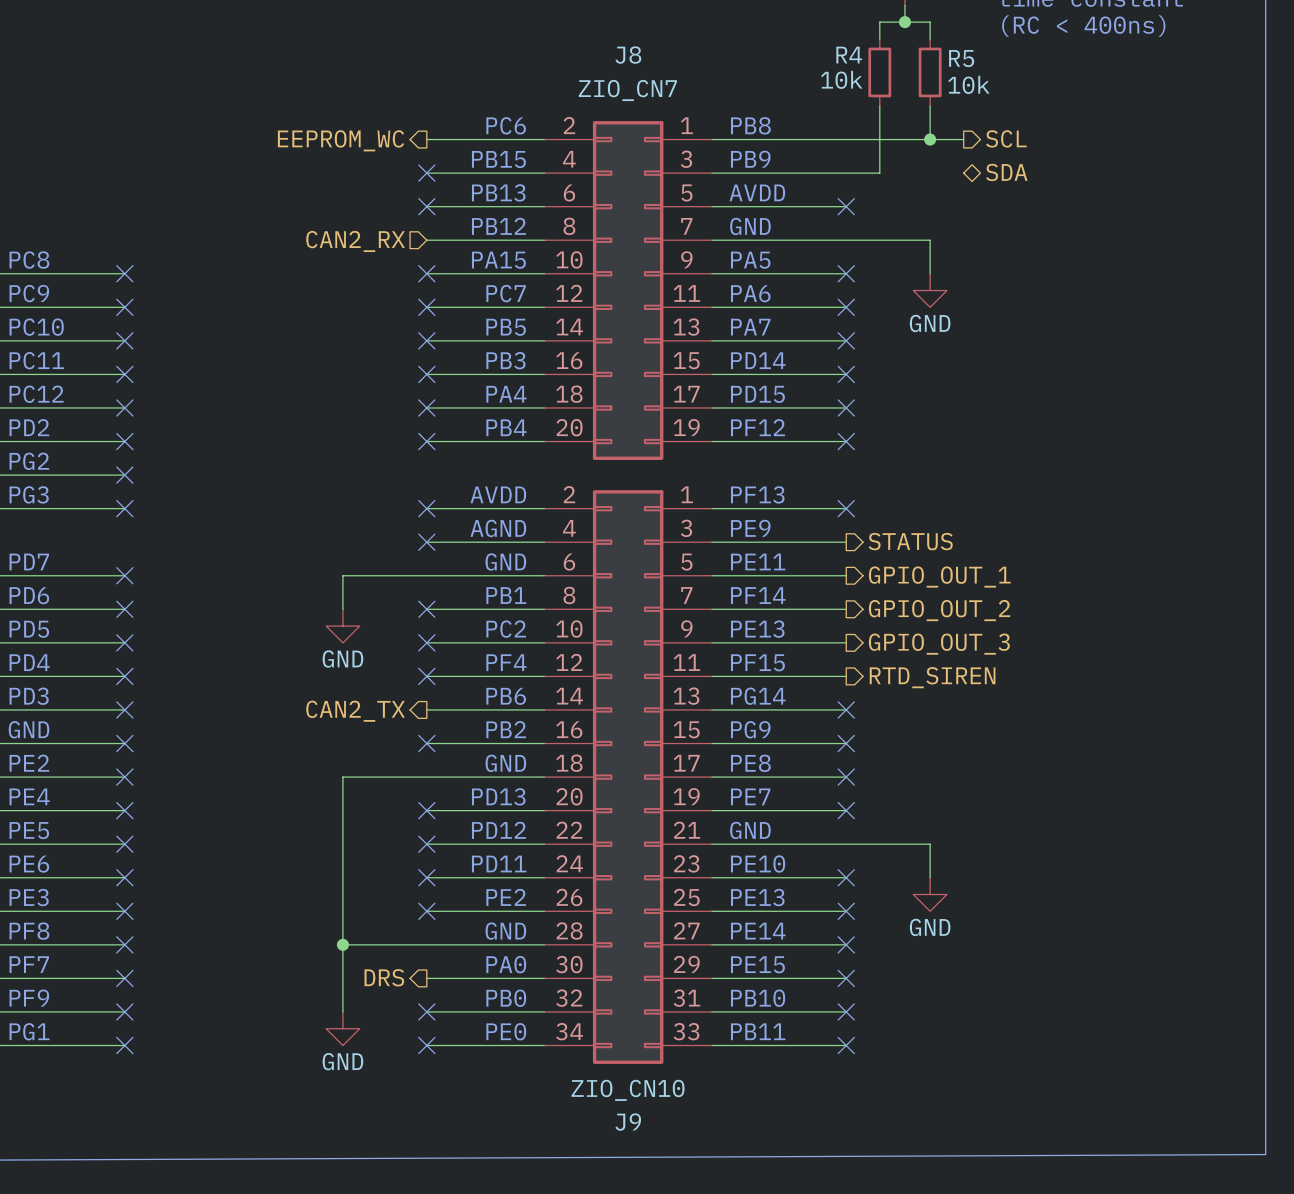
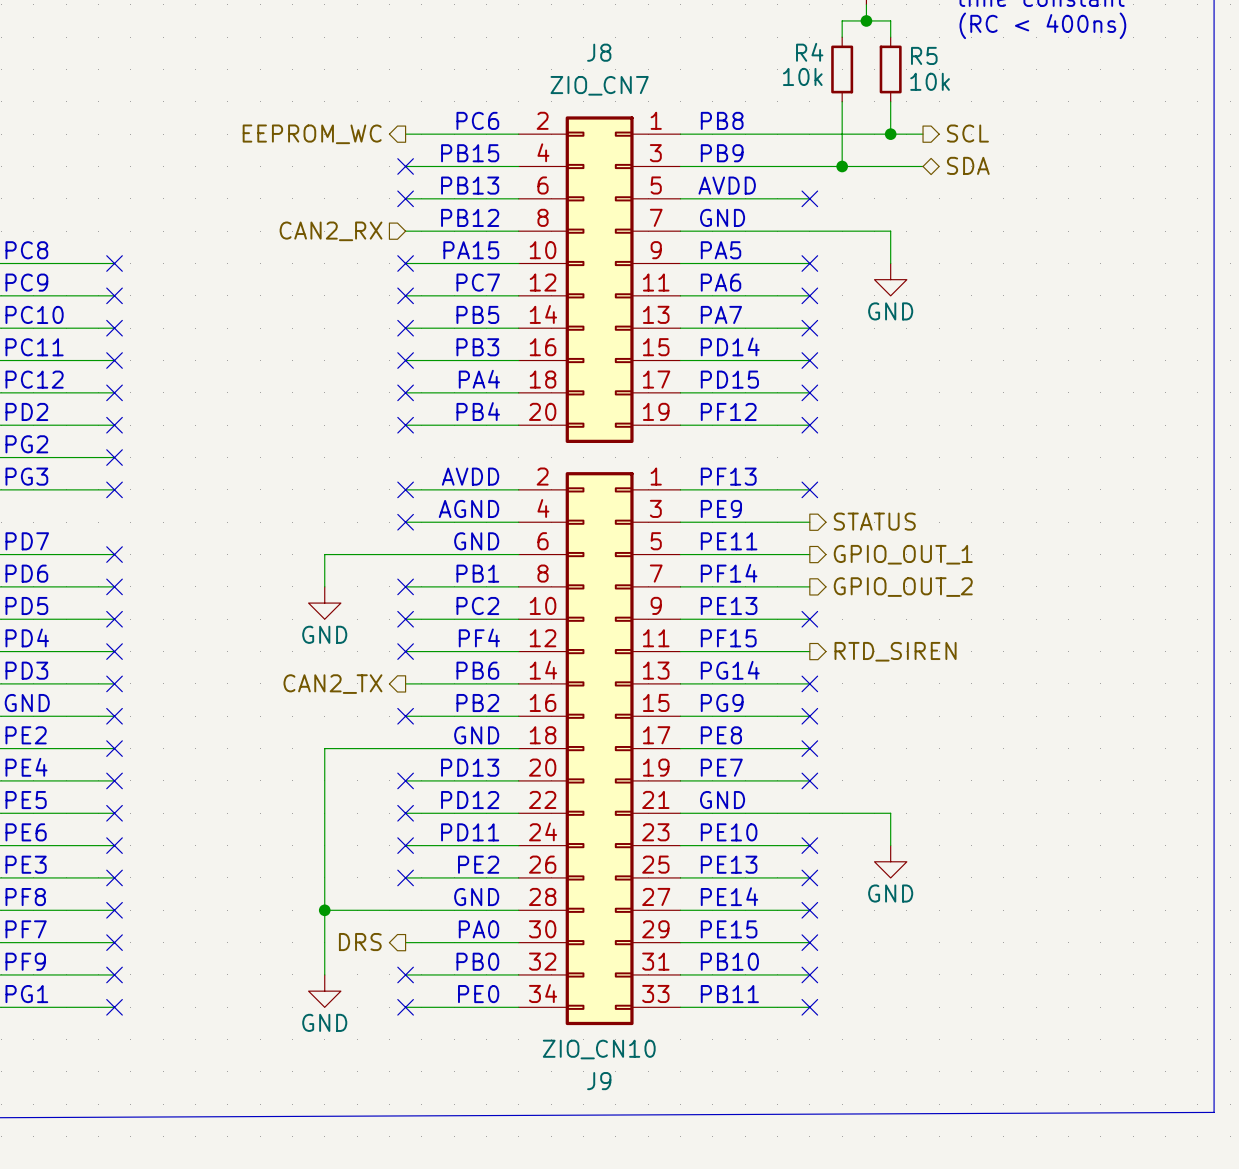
wire: none -> (842, 166) (923, 166)
junction: none -> (842, 166)
no-connect mark: none -> (809, 619)
hierarchical label: GPIO_OUT_3 (939, 644) -> none

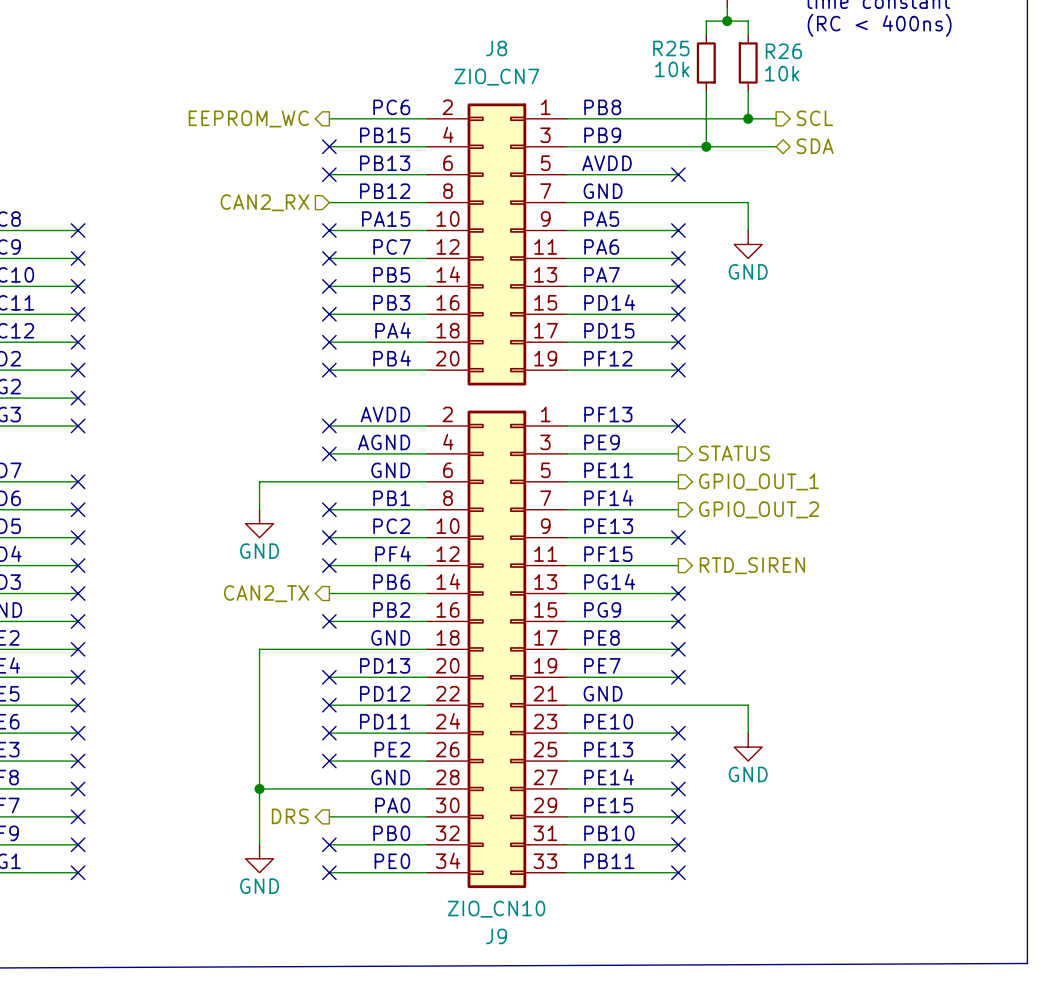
R4 name: R4 (809, 52) -> R25 (671, 48)
R5 name: R5 (924, 55) -> R26 (783, 51)

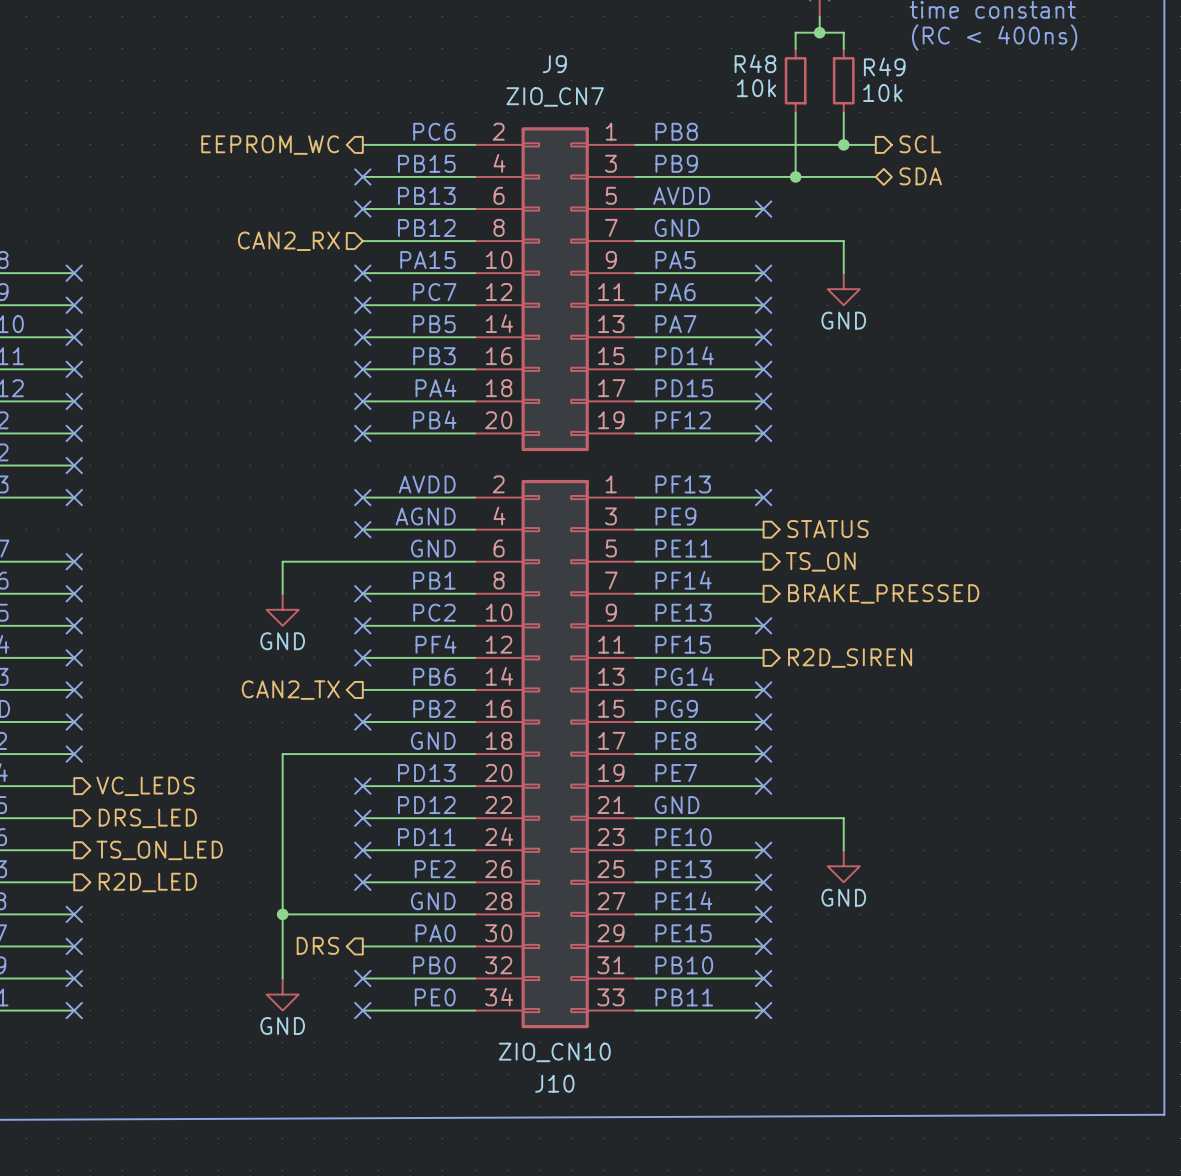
J8 name: J8 (496, 48) -> J9 (554, 64)
R25 name: R25 (671, 48) -> R48 (755, 63)
R26 name: R26 (783, 51) -> R49 (884, 66)
hierarchical label: GPIO_OUT_1 (759, 481) -> TS_ON (820, 561)
hierarchical label: GPIO_OUT_2 (759, 509) -> BRAKE_PRESSED (883, 593)
hierarchical label: RTD_SIREN (752, 565) -> R2D_SIREN (850, 658)
no-connect mark: (78, 677) -> none
hierarchical label: none -> VC_LEDS (145, 786)
no-connect mark: (78, 705) -> none
hierarchical label: none -> DRS_LED (147, 818)
no-connect mark: (78, 733) -> none
hierarchical label: none -> TS_ON_LED (159, 850)
no-connect mark: (78, 761) -> none
hierarchical label: none -> R2D_LED (147, 882)
J9 name: J9 (496, 936) -> J10 (554, 1083)

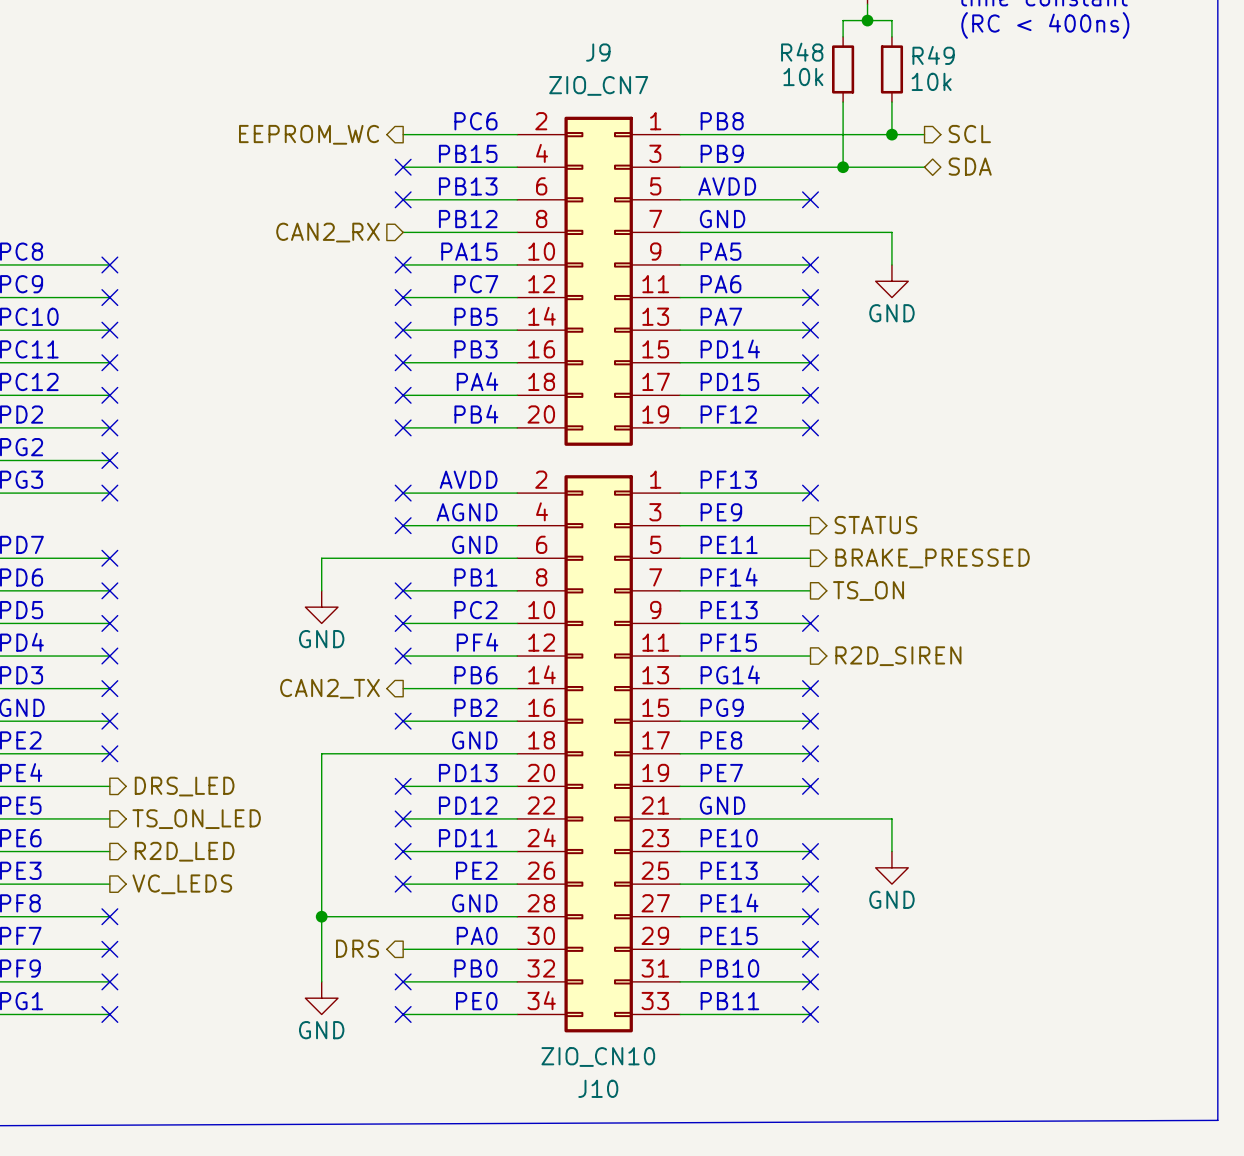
hierarchical label: TS_ON (820, 561) -> BRAKE_PRESSED (932, 558)
hierarchical label: BRAKE_PRESSED (883, 593) -> TS_ON (868, 591)
hierarchical label: VC_LEDS (145, 786) -> DRS_LED (184, 786)
hierarchical label: DRS_LED (147, 818) -> TS_ON_LED (196, 819)
hierarchical label: TS_ON_LED (159, 850) -> R2D_LED (184, 851)
hierarchical label: R2D_LED (147, 882) -> VC_LEDS (182, 884)

